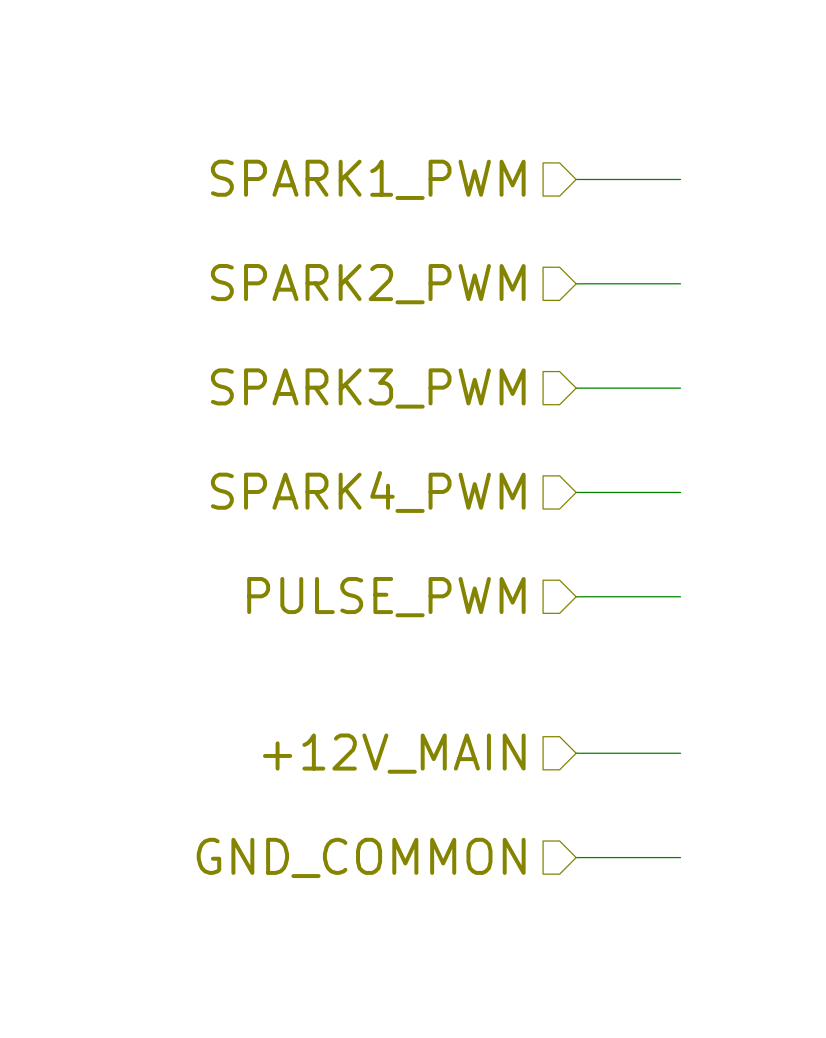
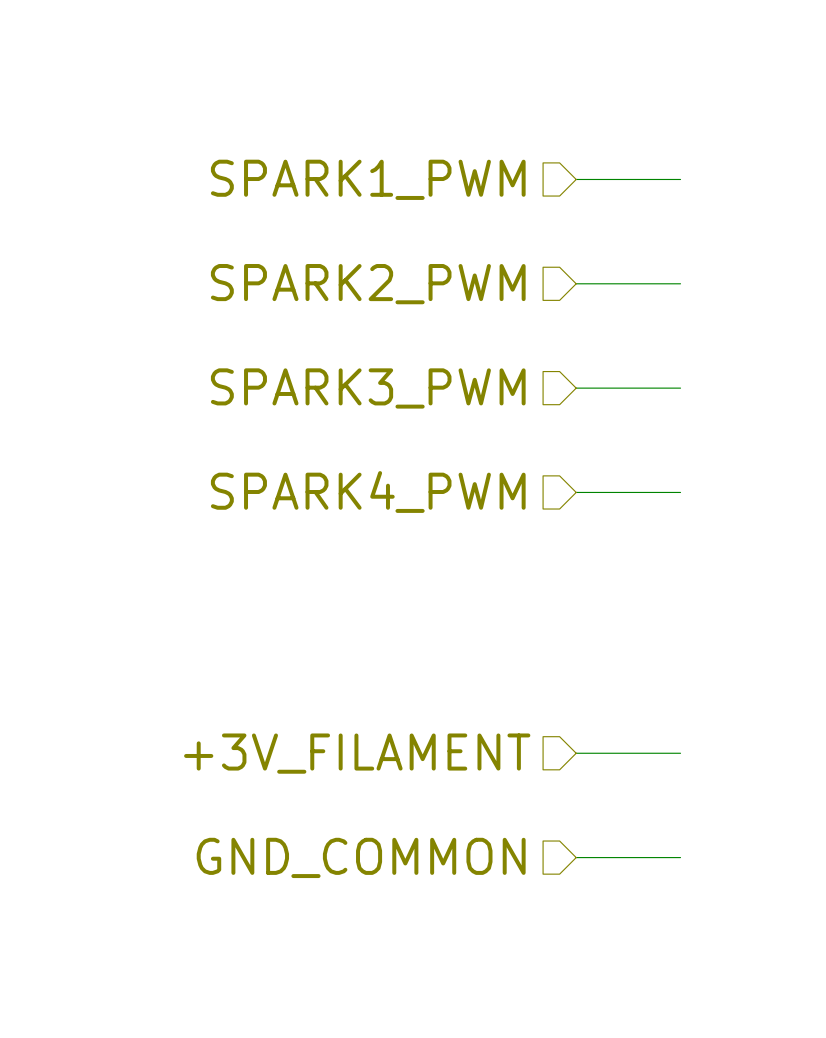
wire: (576, 596) (680, 596) -> none
hierarchical label: PULSE_PWM (386, 597) -> none
hierarchical label: +12V_MAIN (394, 753) -> +3V_FILAMENT (357, 753)

